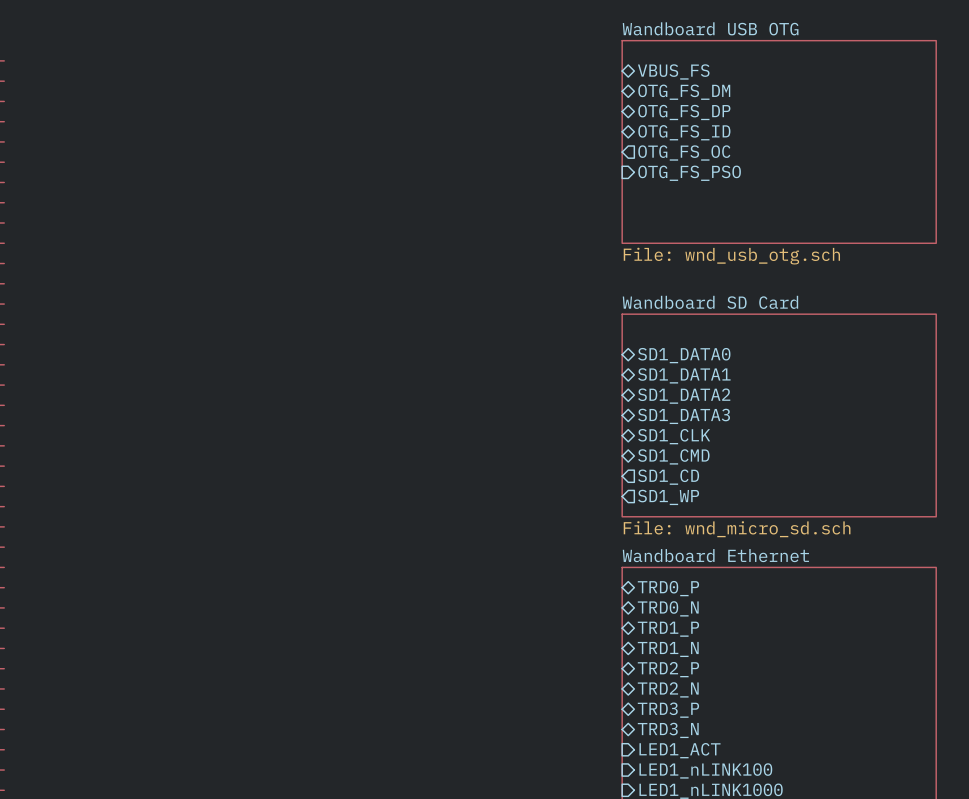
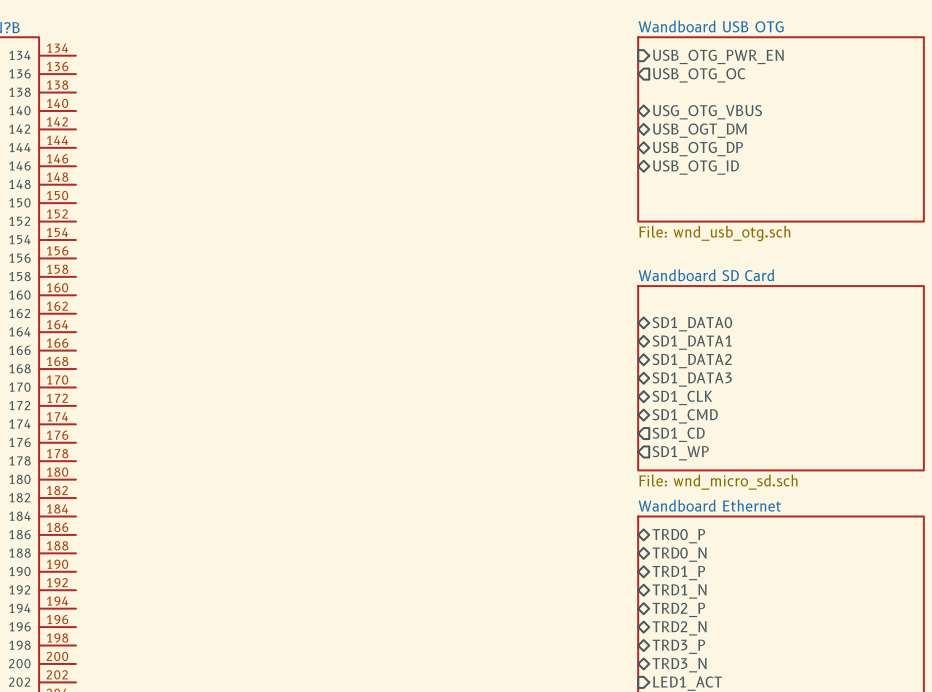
sheet pin: none -> USB_OTG_PWR_EN (718, 56)
sheet pin: VBUS_FS (673, 71) -> none
sheet pin: none -> USB_OTG_OC (699, 75)
sheet pin: OTG_FS_DM (684, 92) -> none
sheet pin: OTG_FS_DP (684, 112) -> none
sheet pin: none -> USG_OTG_VBUS (707, 112)
sheet pin: OTG_FS_ID (684, 132) -> none
sheet pin: none -> USB_OGT_DM (699, 130)
sheet pin: OTG_FS_OC (684, 153) -> none
sheet pin: none -> USB_OTG_DP (697, 149)
sheet pin: OTG_FS_PSO (689, 173) -> none
sheet pin: none -> USB_OTG_ID (695, 167)

